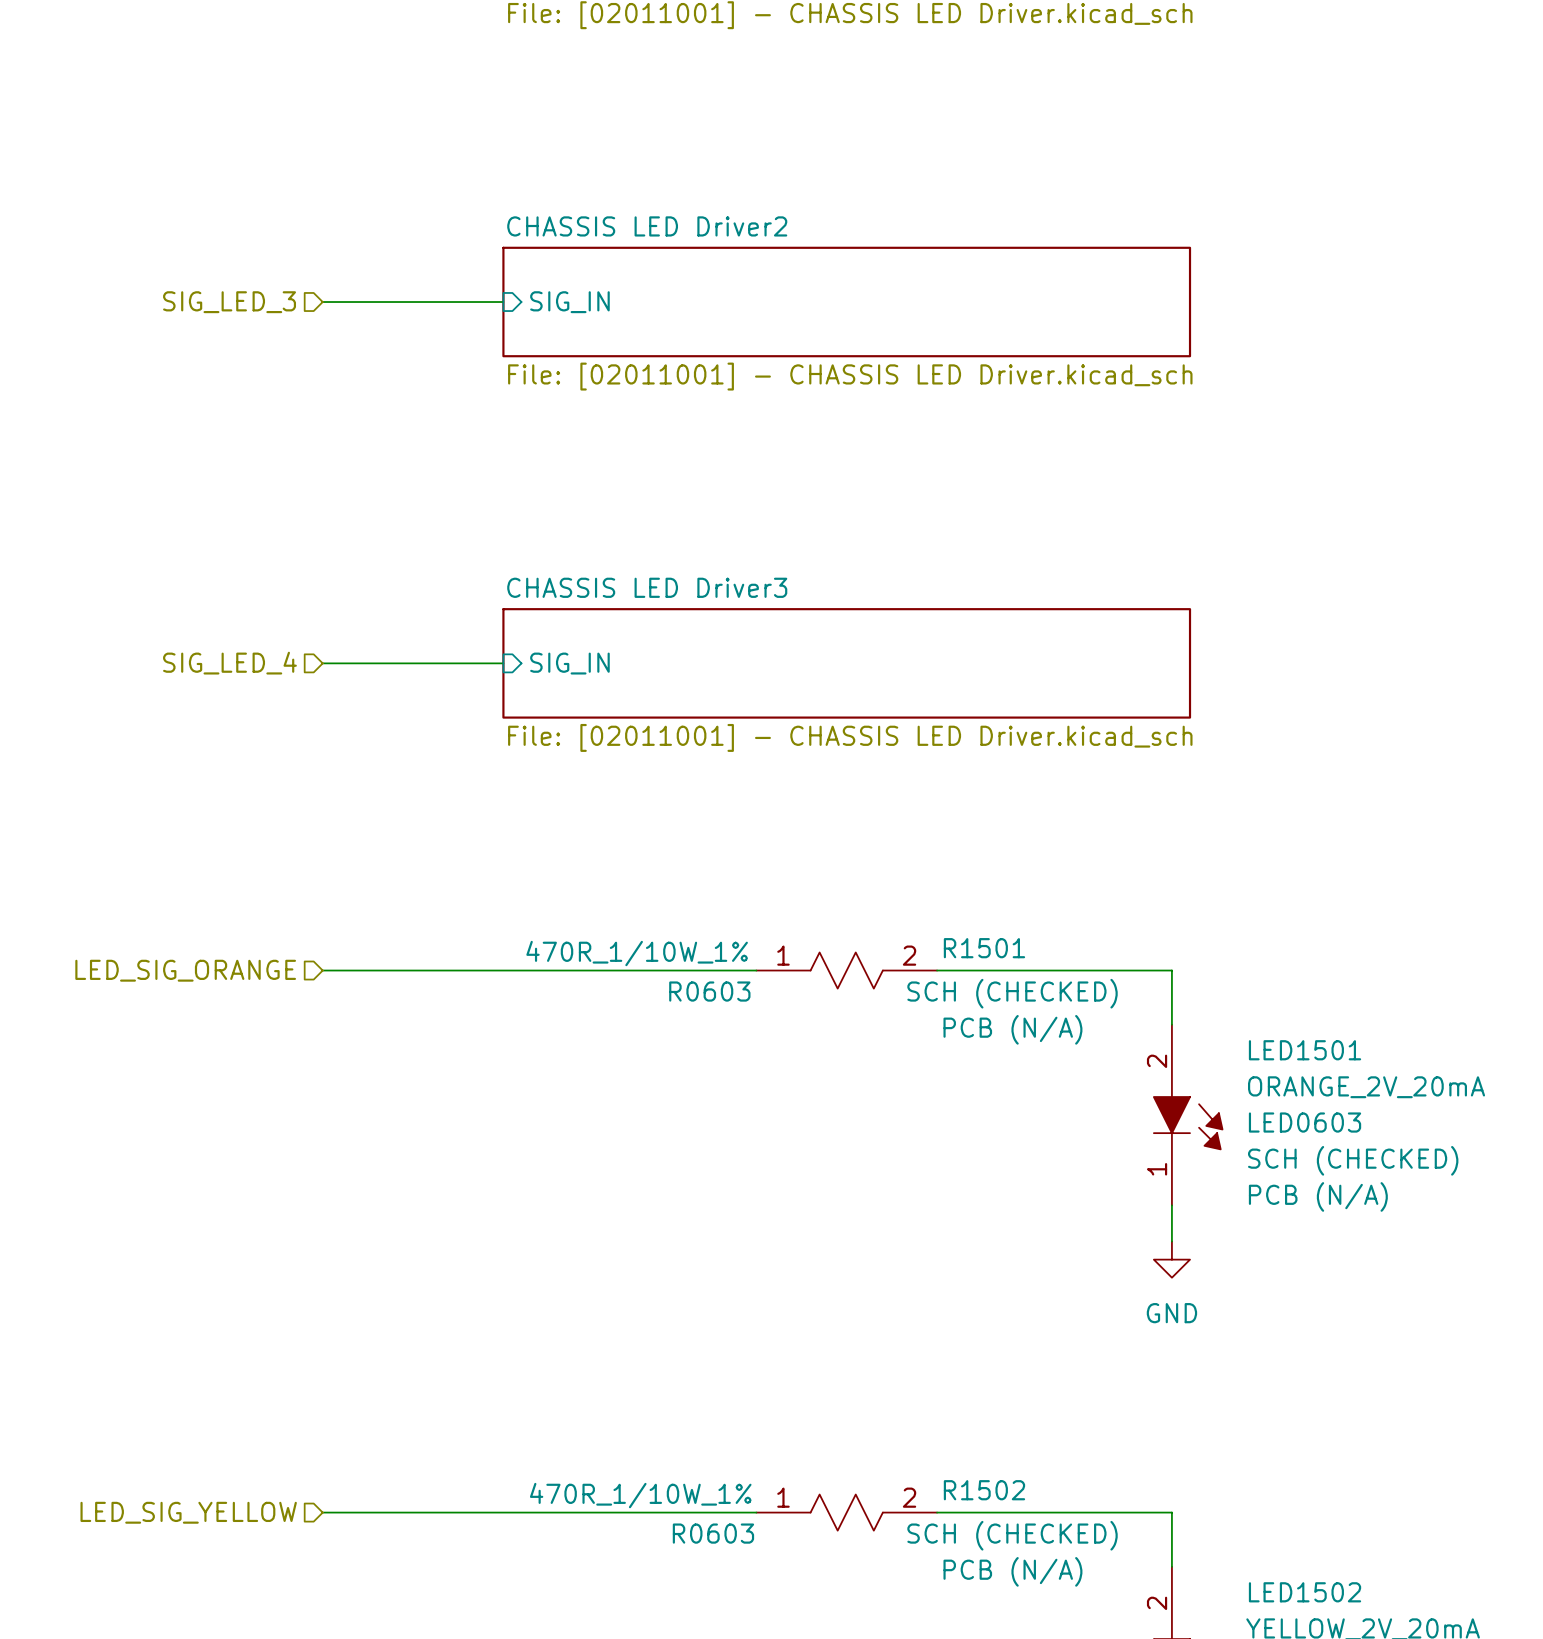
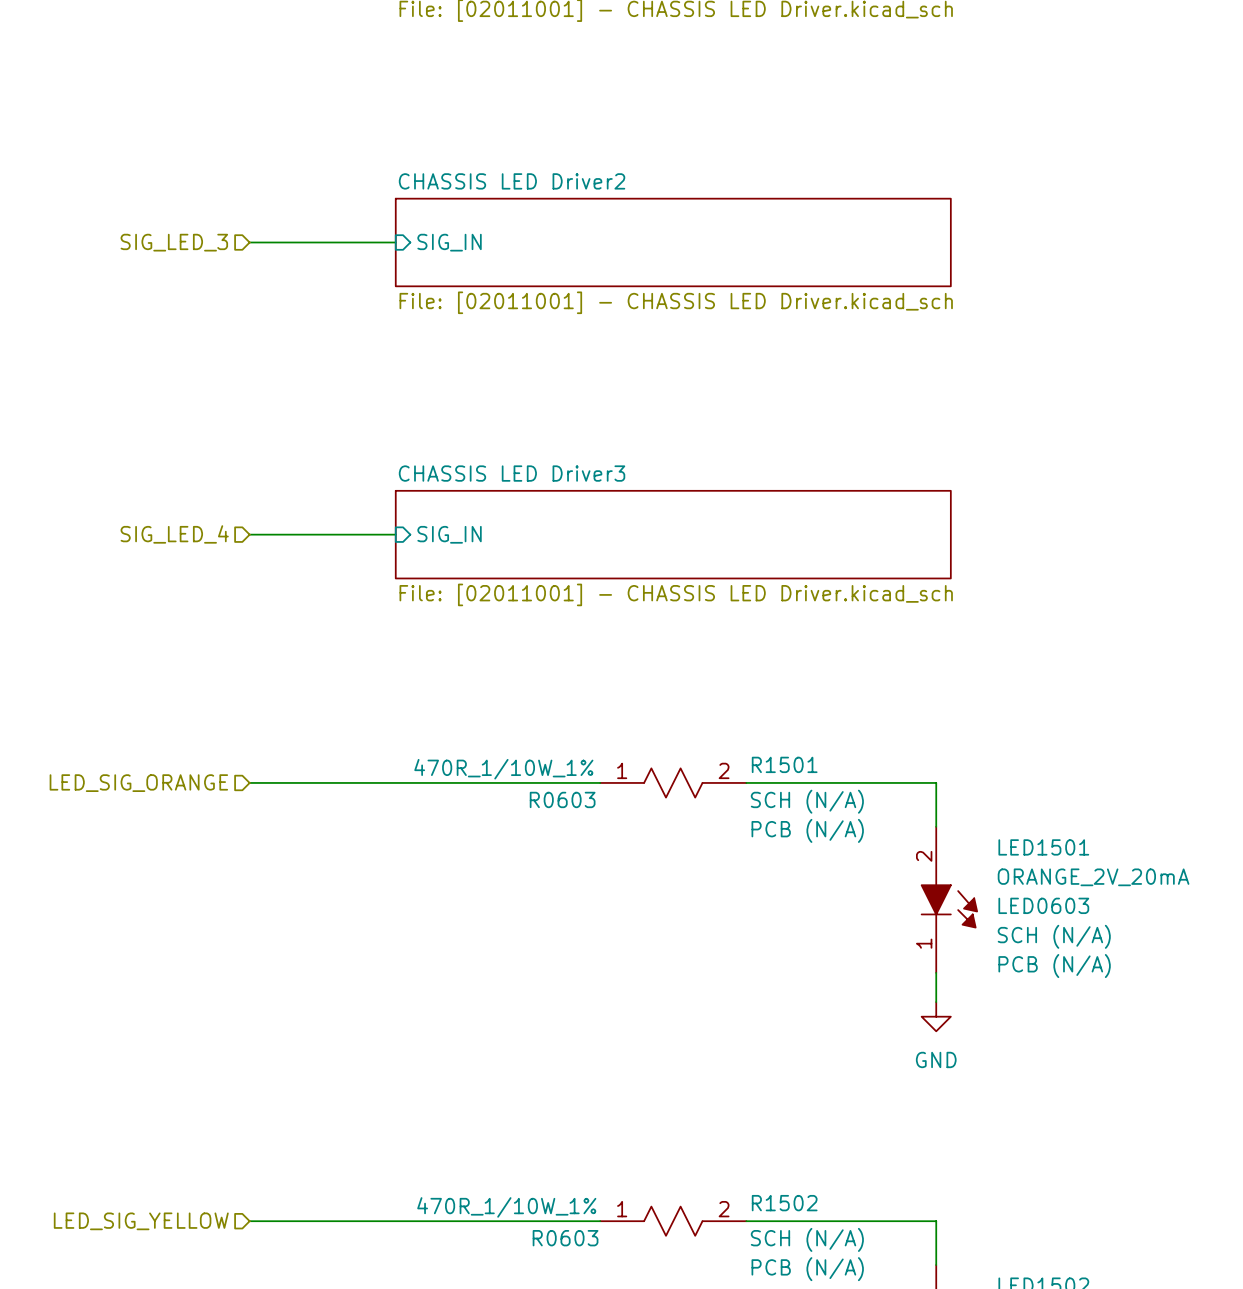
R1501 text: SCH (CHECKED) (1012, 993) -> SCH (N/A) (807, 801)
LED1501 text: SCH (CHECKED) (1353, 1160) -> SCH (N/A) (1054, 936)
R1502 text: SCH (CHECKED) (1012, 1535) -> SCH (N/A) (807, 1239)

